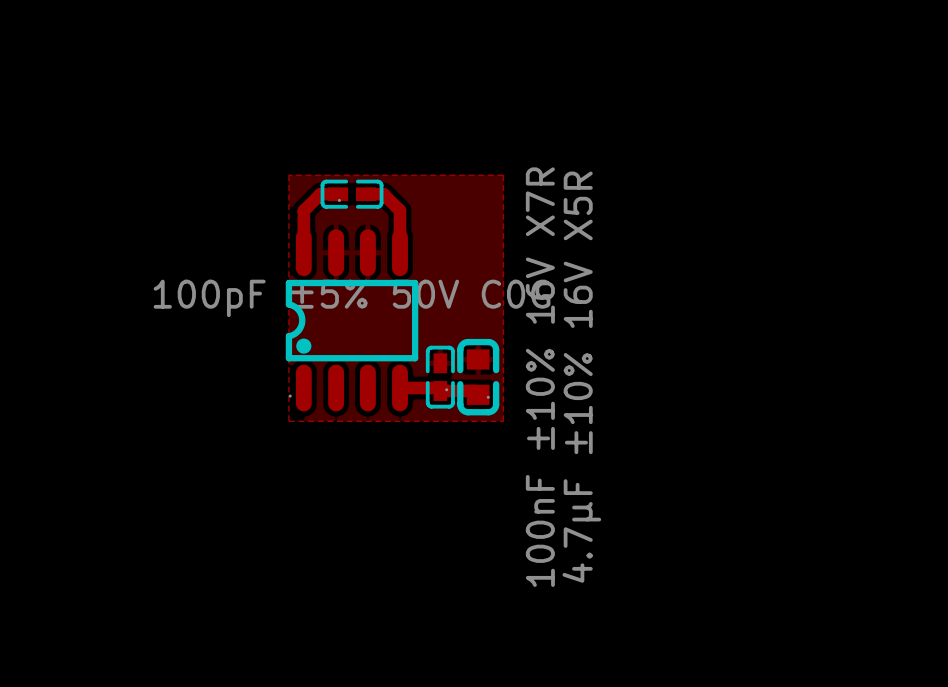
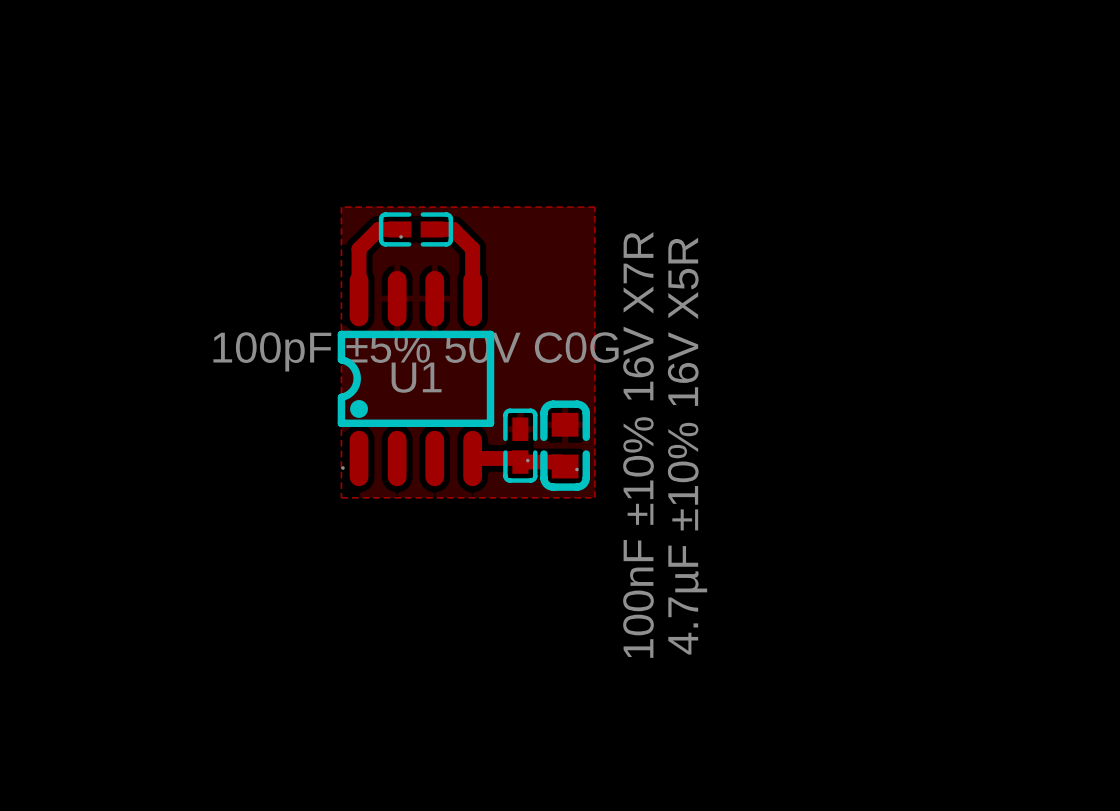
U1 name: none -> U1 (416, 377)

